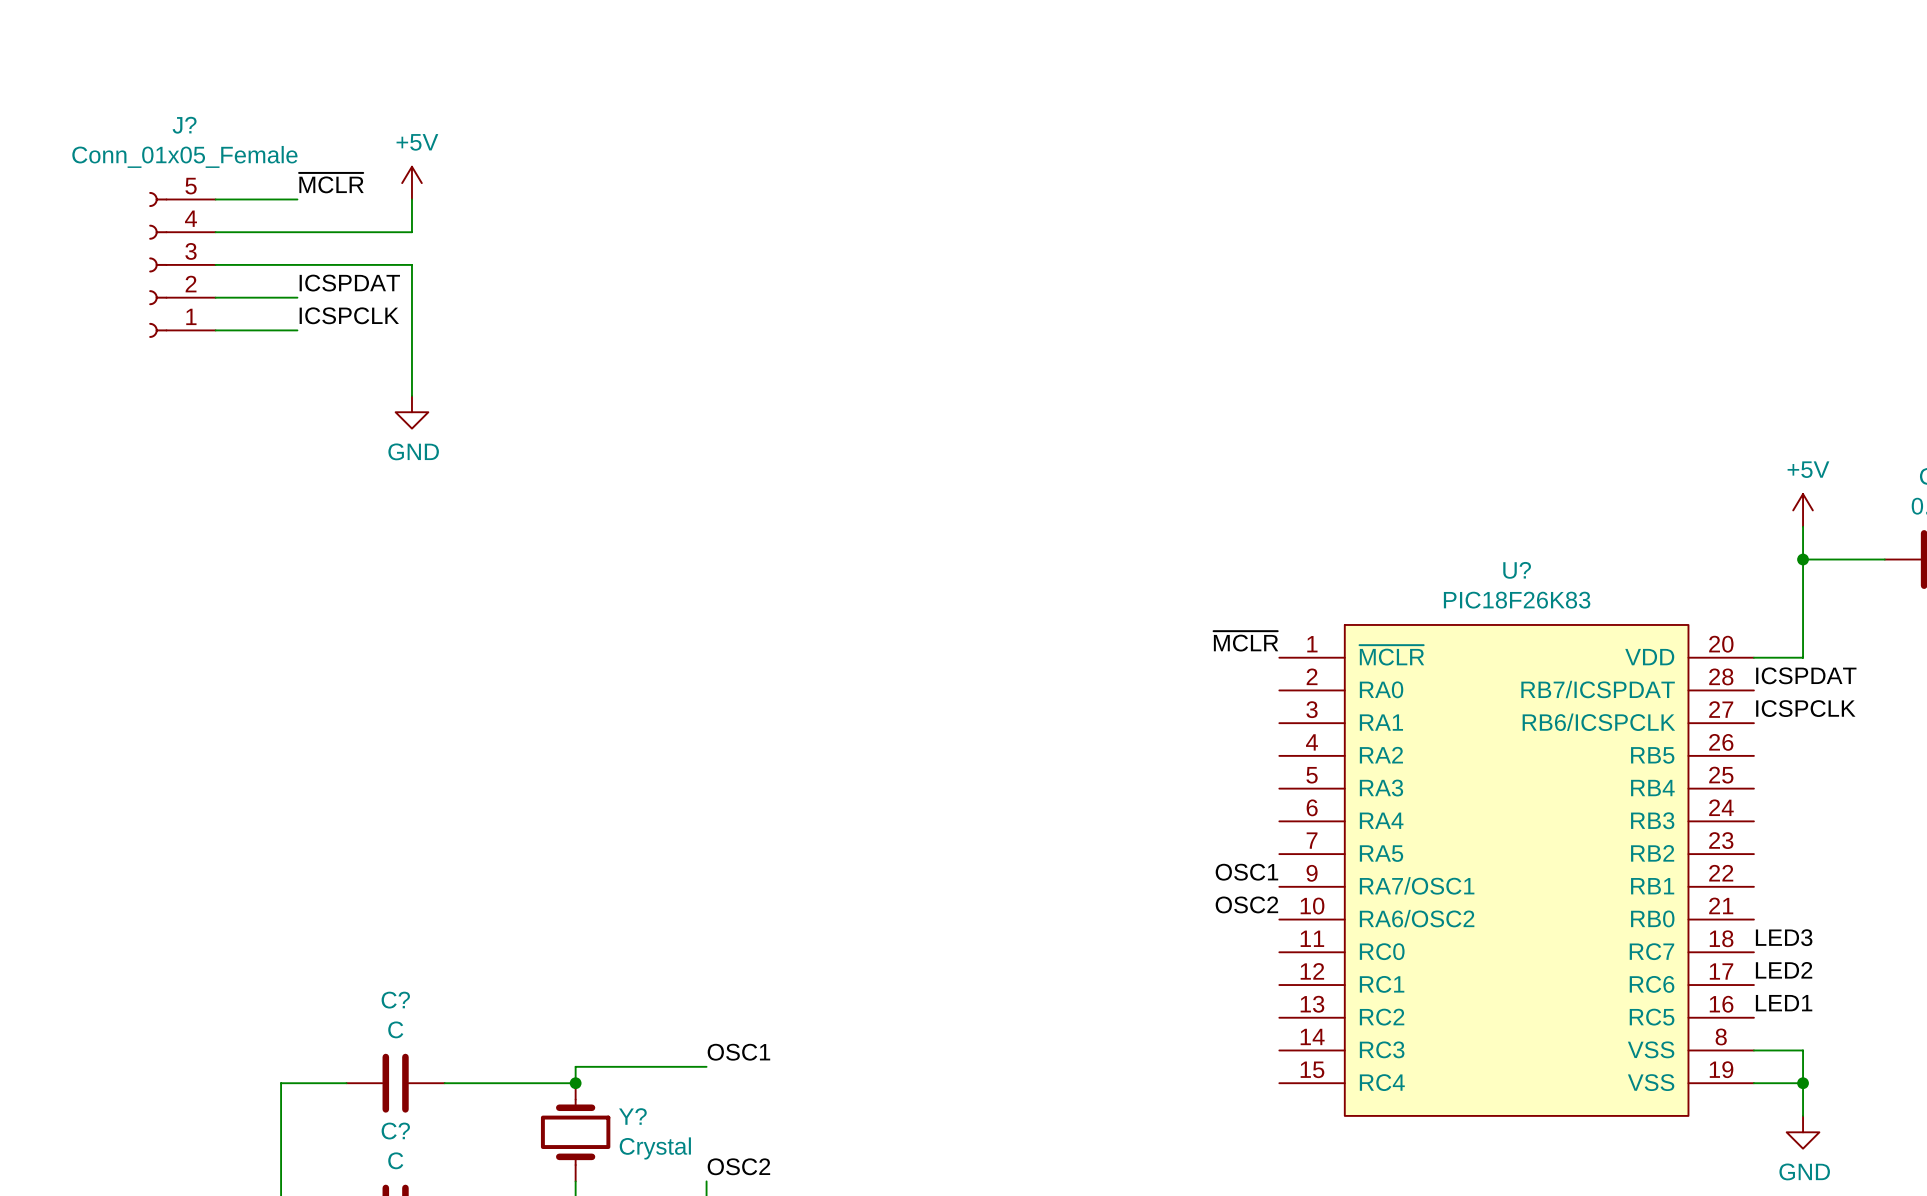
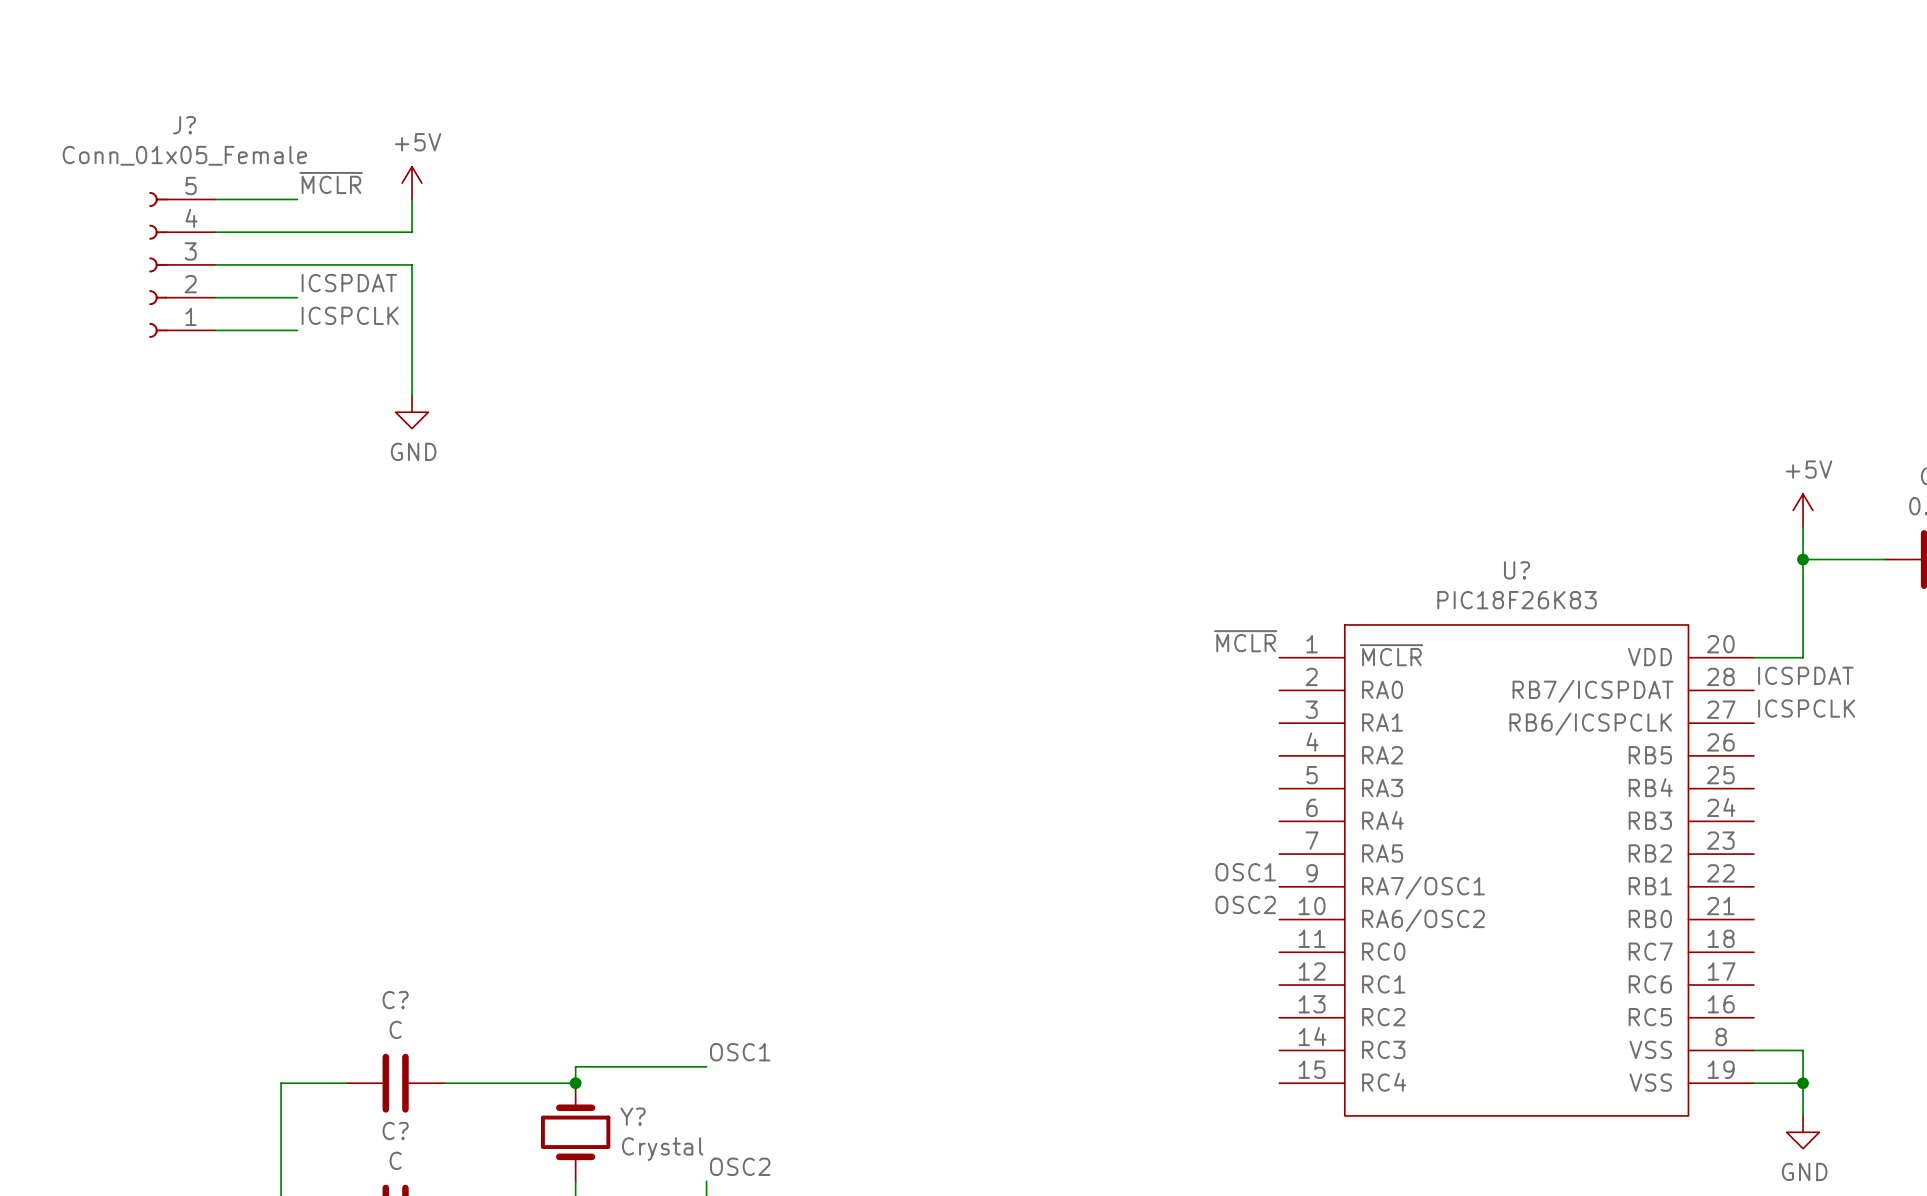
label: LED3 (1784, 937) -> none
label: LED2 (1784, 970) -> none
label: LED1 (1784, 1003) -> none

